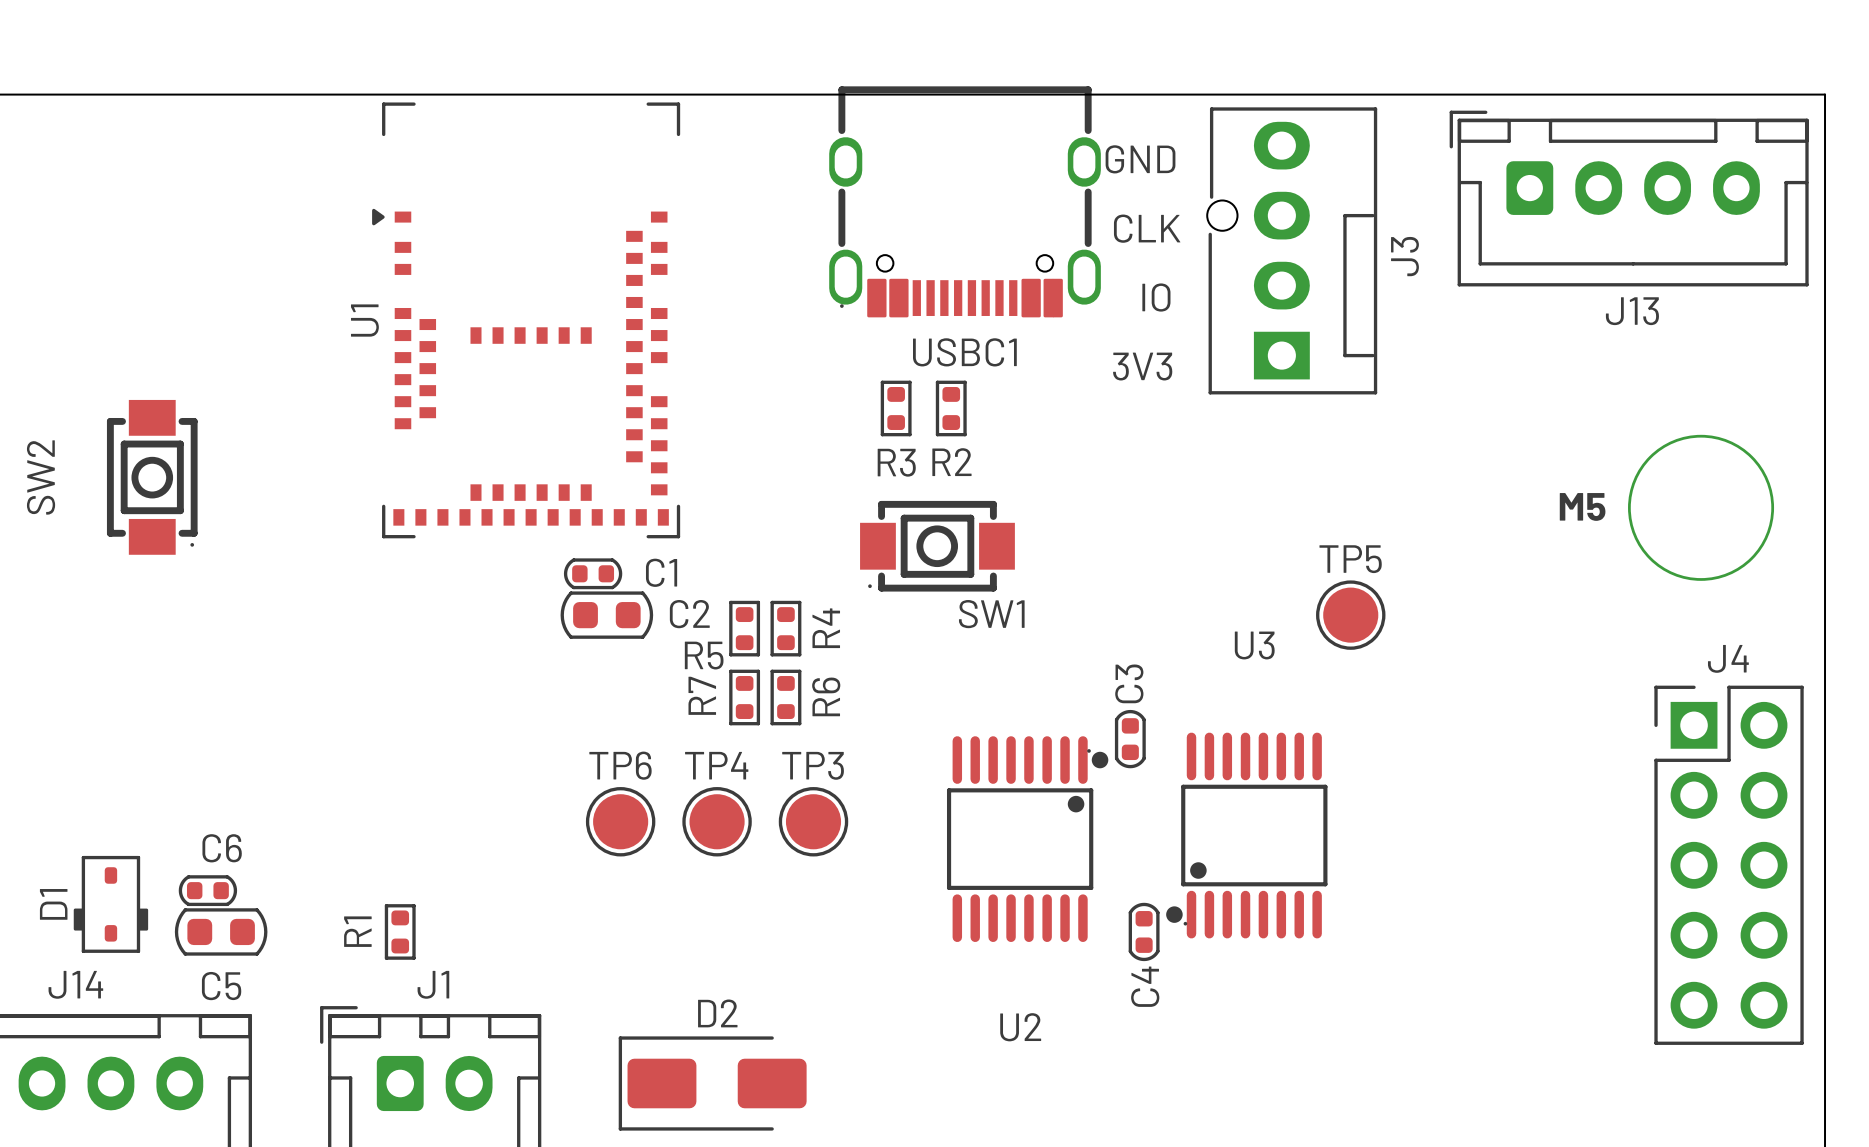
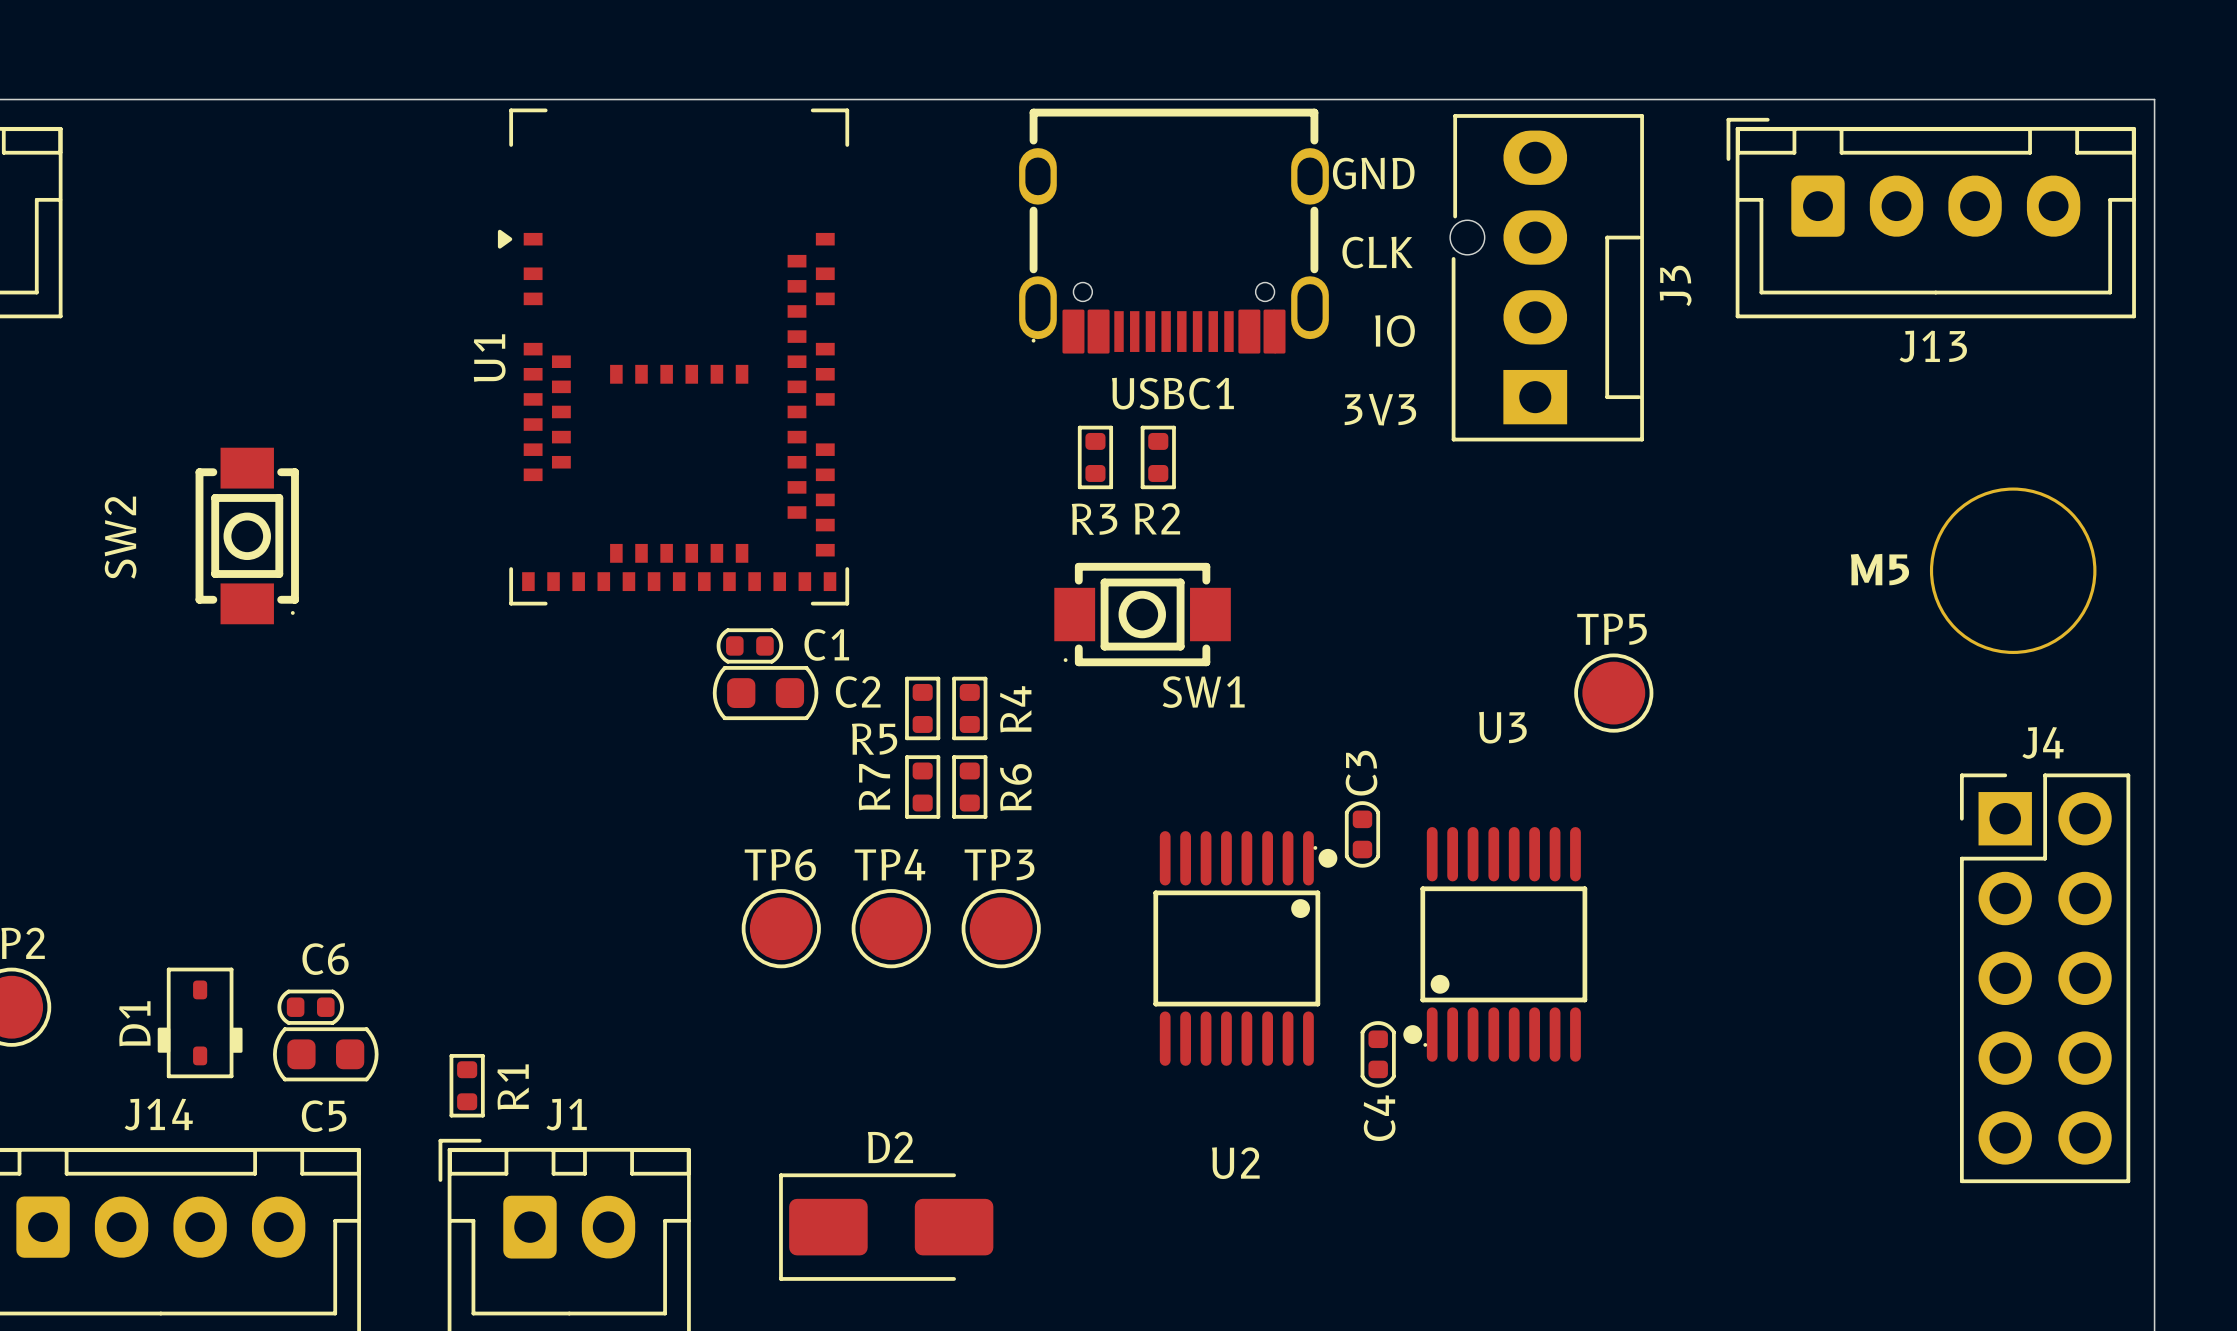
USBC1 footprint: [829, 86, 1101, 318] -> [1019, 108, 1329, 354]
R1 name position: R1 (357, 931) -> R1 (513, 1087)
R1 position: (400, 931) -> (467, 1085)

